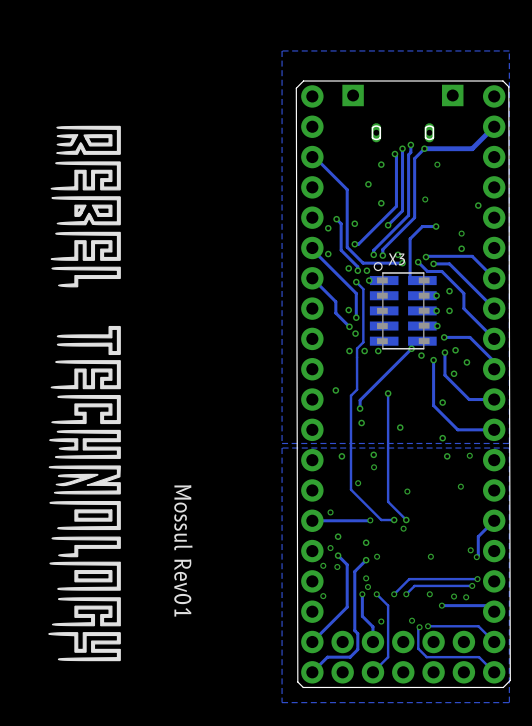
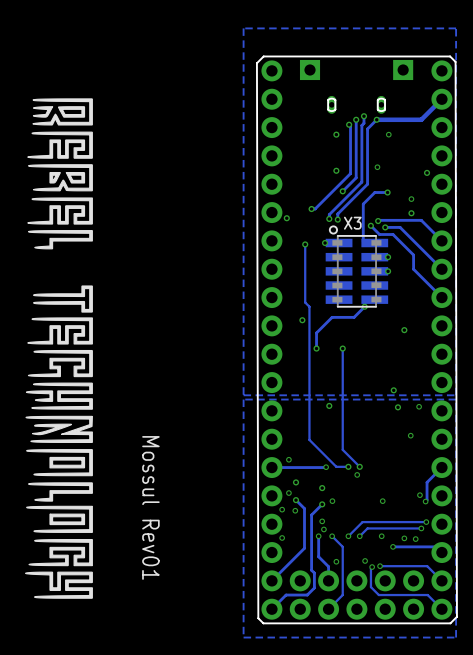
track: (312, 157) (314, 157) (347, 189) (347, 247) (363, 263) (402, 263) -> none
via: (368, 184) -> none
track: (336, 219) (341, 223) (341, 250) (357, 266) (357, 270) -> none
via: (336, 219) -> none
via: (354, 223) -> none
via: (328, 228) -> none
track: (312, 247) (356, 293) (356, 317) -> none
via: (397, 254) -> none
via: (402, 263) -> none
via: (348, 268) -> none
via: (357, 270) -> none
via: (366, 270) -> none
track: (312, 278) (335, 301) (335, 313) (349, 326) -> none
via: none -> (305, 244)
track: (356, 282) (363, 289) (363, 342) (357, 348) (357, 389) (350, 395) (352, 491) -> (305, 244) (305, 302) (309, 306) (309, 439)
via: (356, 282) -> none
via: (449, 291) -> none
via: (348, 310) -> none
via: (449, 310) -> none
via: (356, 317) -> none
via: (349, 326) -> none
via: (437, 326) -> none
via: (355, 333) -> none
track: (444, 337) (469, 337) (494, 361) (494, 369) -> none
via: (444, 337) -> none
via: (455, 350) -> none
via: (349, 351) -> none
via: (364, 351) -> none
via: (378, 351) -> none
track: (444, 352) (444, 375) (469, 399) (494, 399) -> none
via: (444, 352) -> none
via: (421, 355) -> none
track: (400, 360) (360, 400) (360, 408) -> (354, 317) (332, 317) (316, 332) (316, 348)
track: (433, 360) (433, 405) (457, 429) (494, 429) -> none
via: (433, 360) -> none
via: (466, 362) -> none
via: none -> (302, 320)
via: (335, 390) -> none
via: none -> (316, 348)
via: (442, 402) -> none
via: (360, 408) -> none
via: (361, 423) -> none
via: (400, 427) -> none
via: (341, 456) -> none
via: (374, 467) -> none
via: (358, 483) -> none
via: (407, 491) -> none

